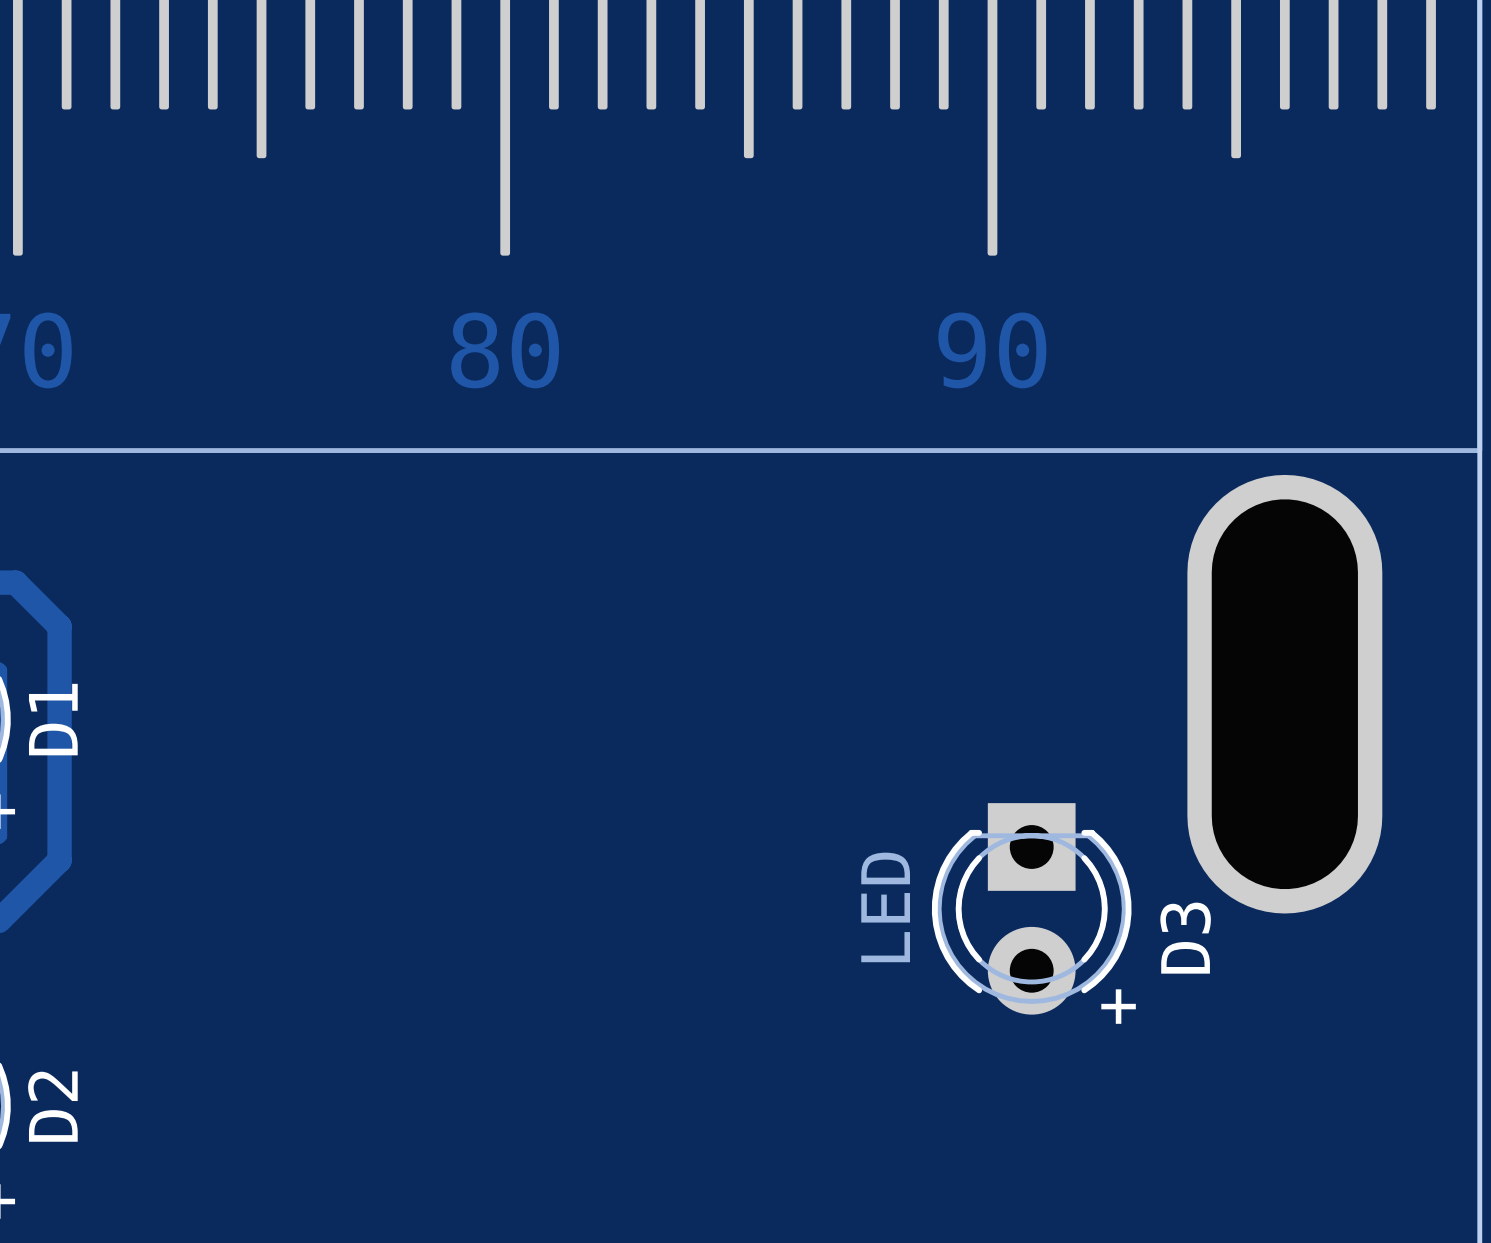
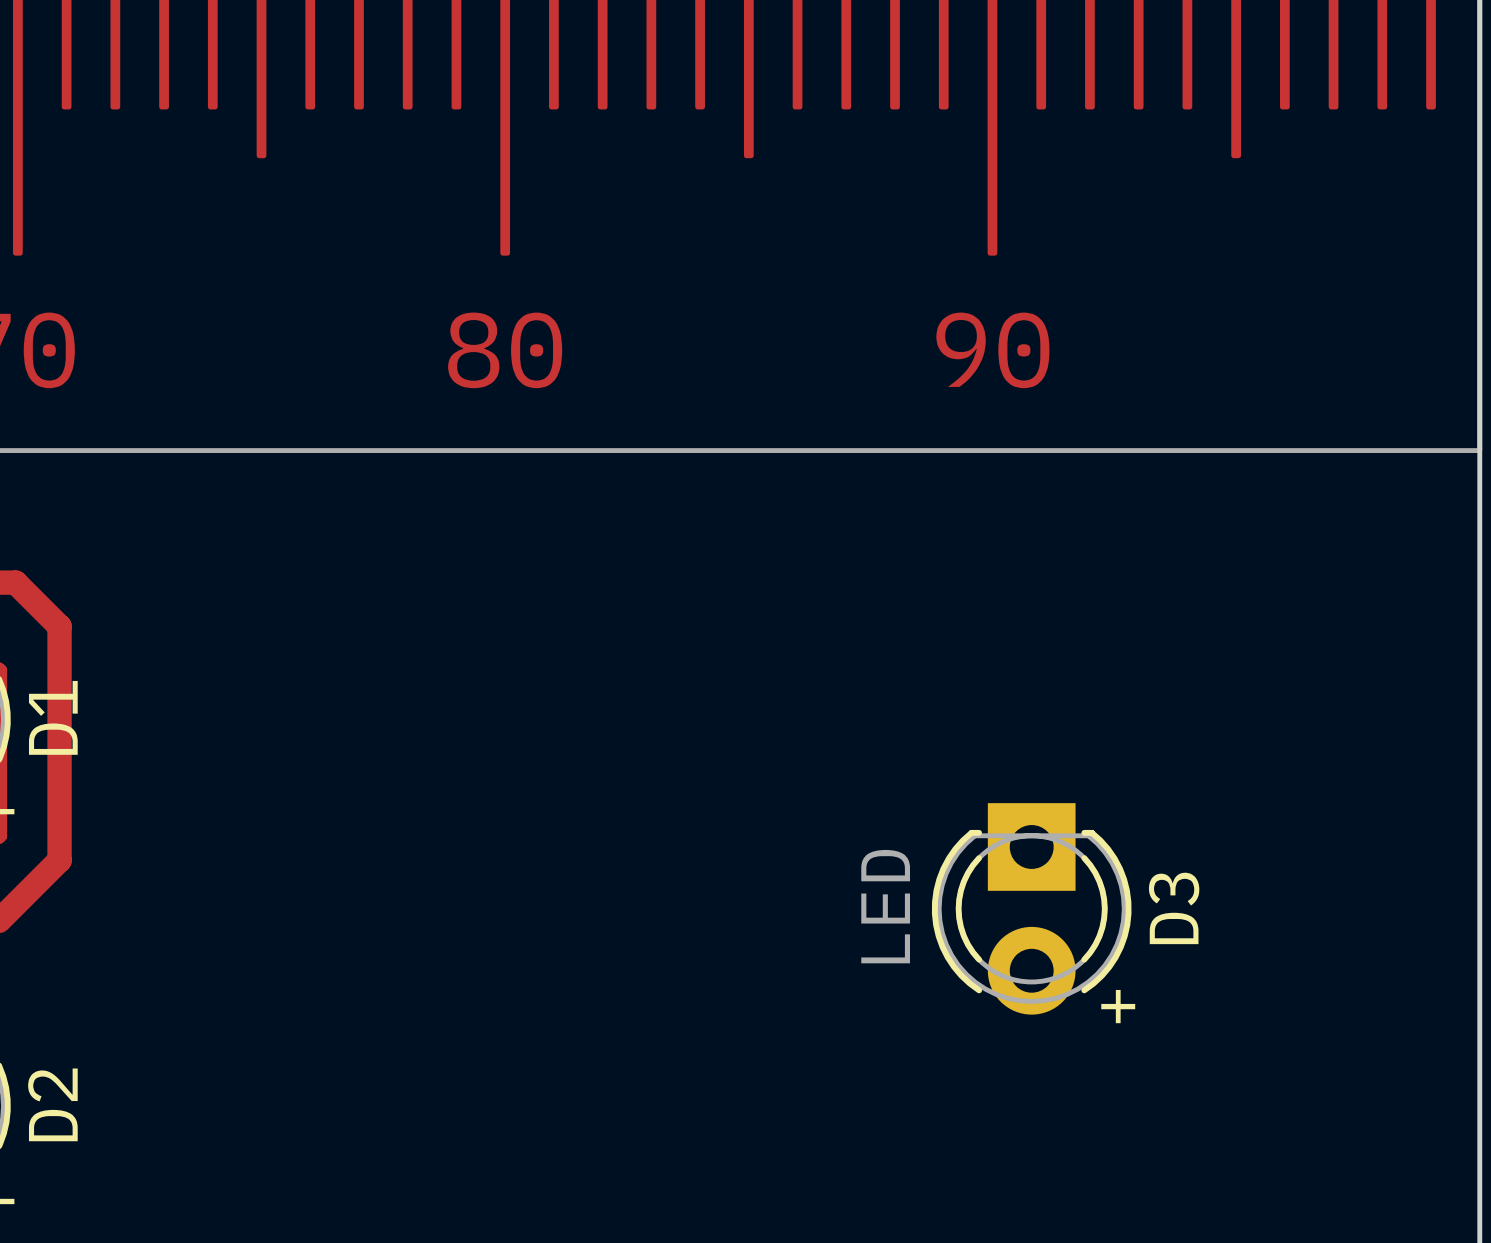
part: (1284, 694) -> none
D3 name position: D3 (1185, 938) -> D3 (1174, 908)

